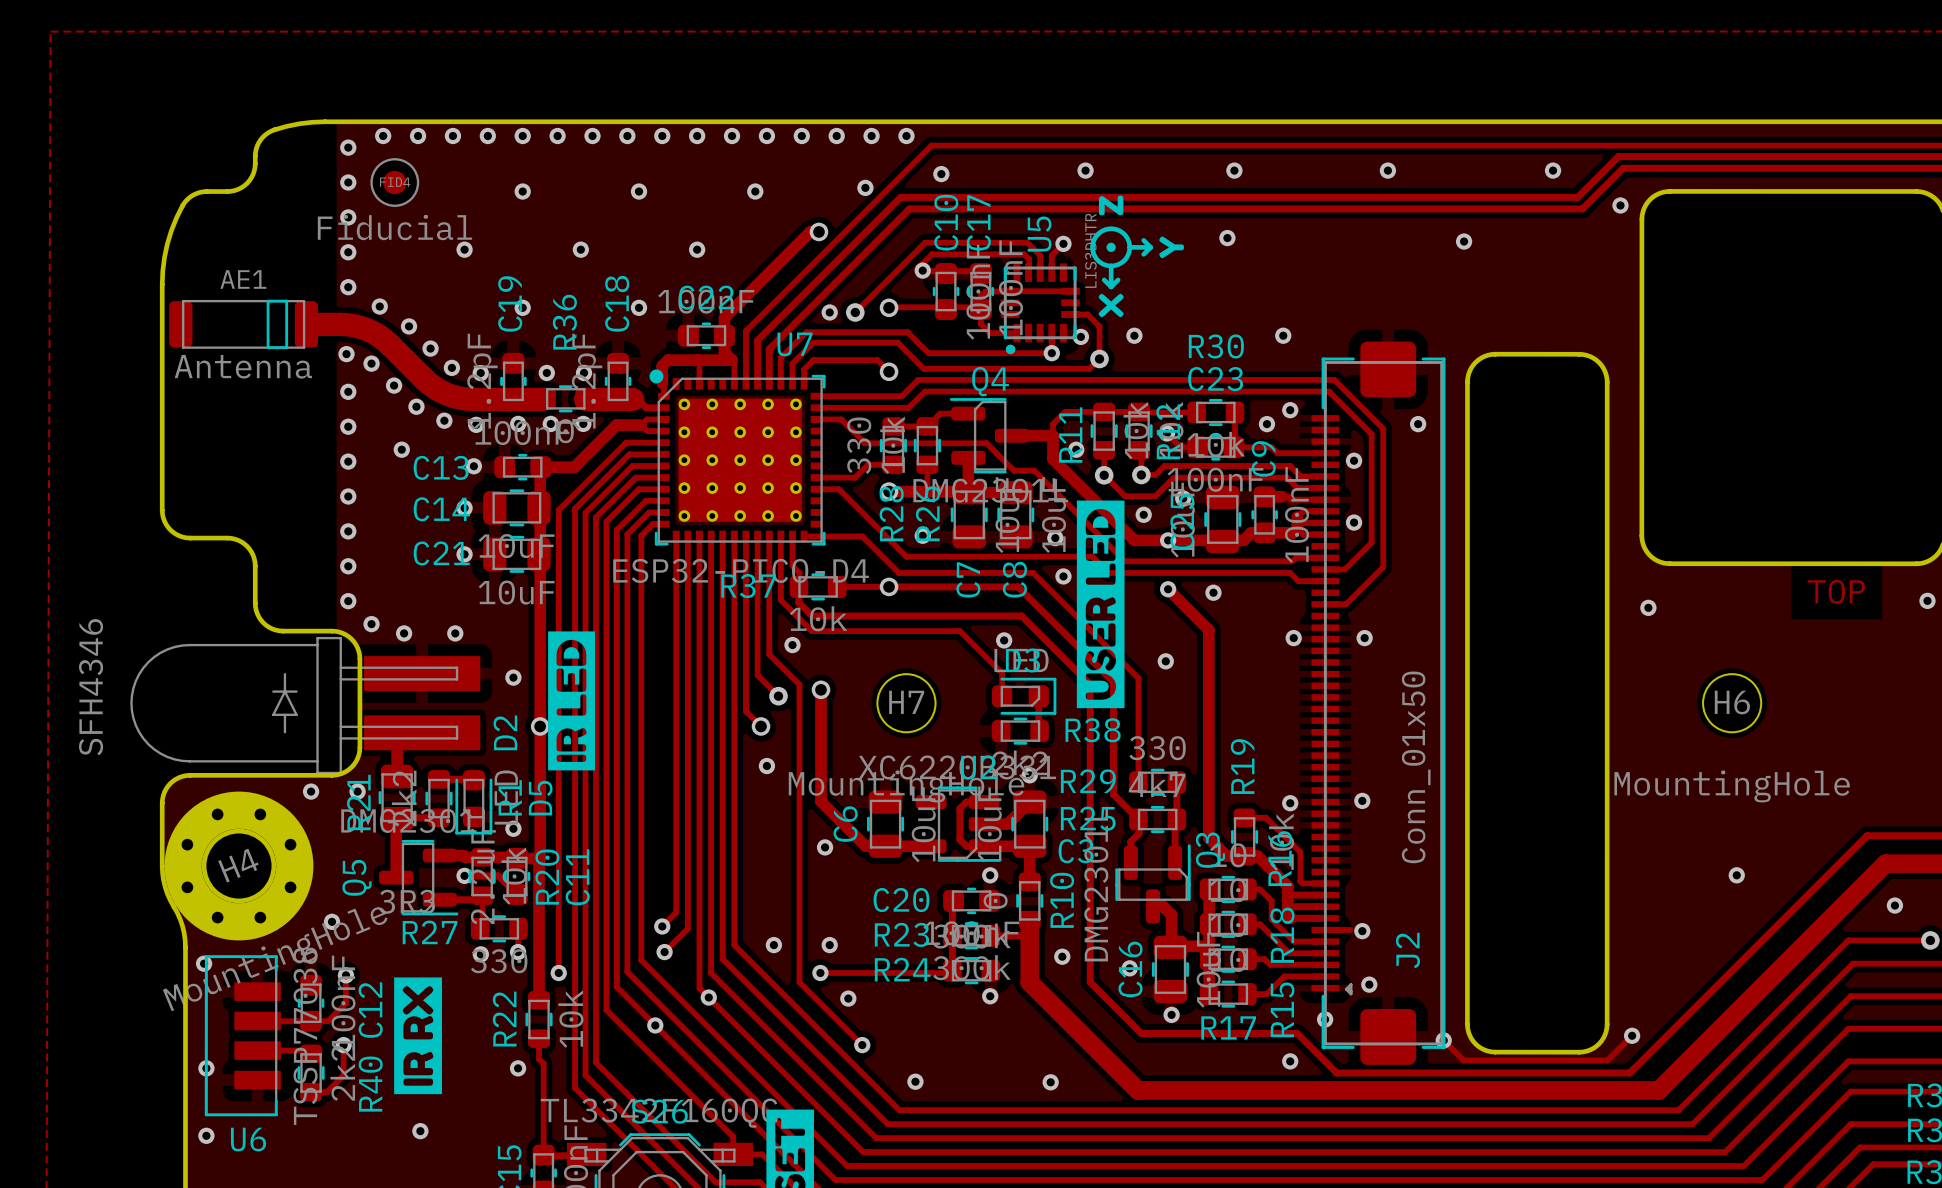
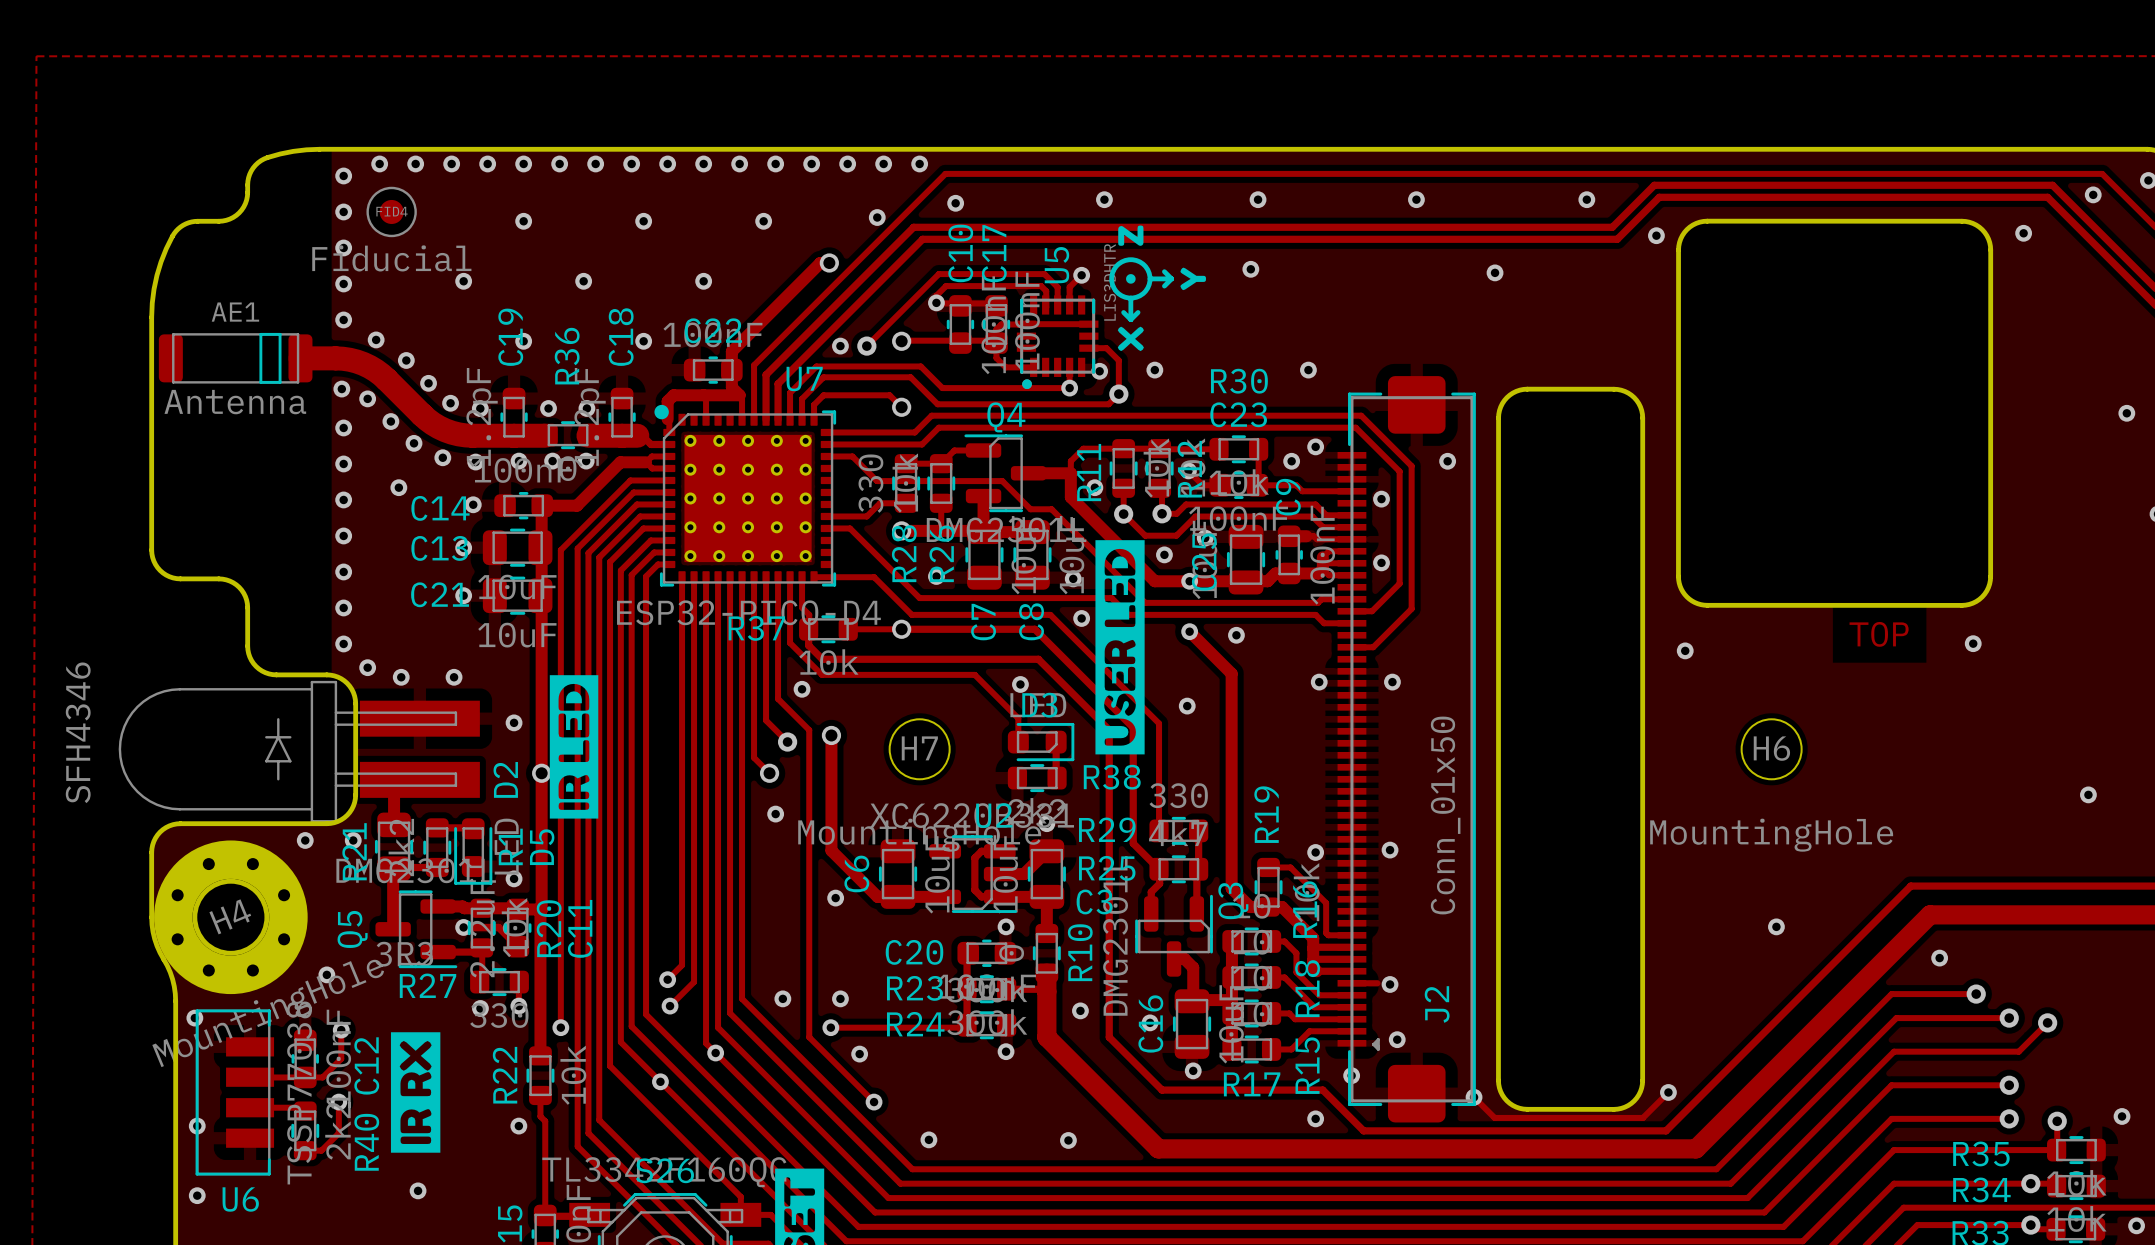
C13 name position: C13 (441, 467) -> C13 (439, 548)
C14 name position: C14 (441, 509) -> C14 (440, 508)

